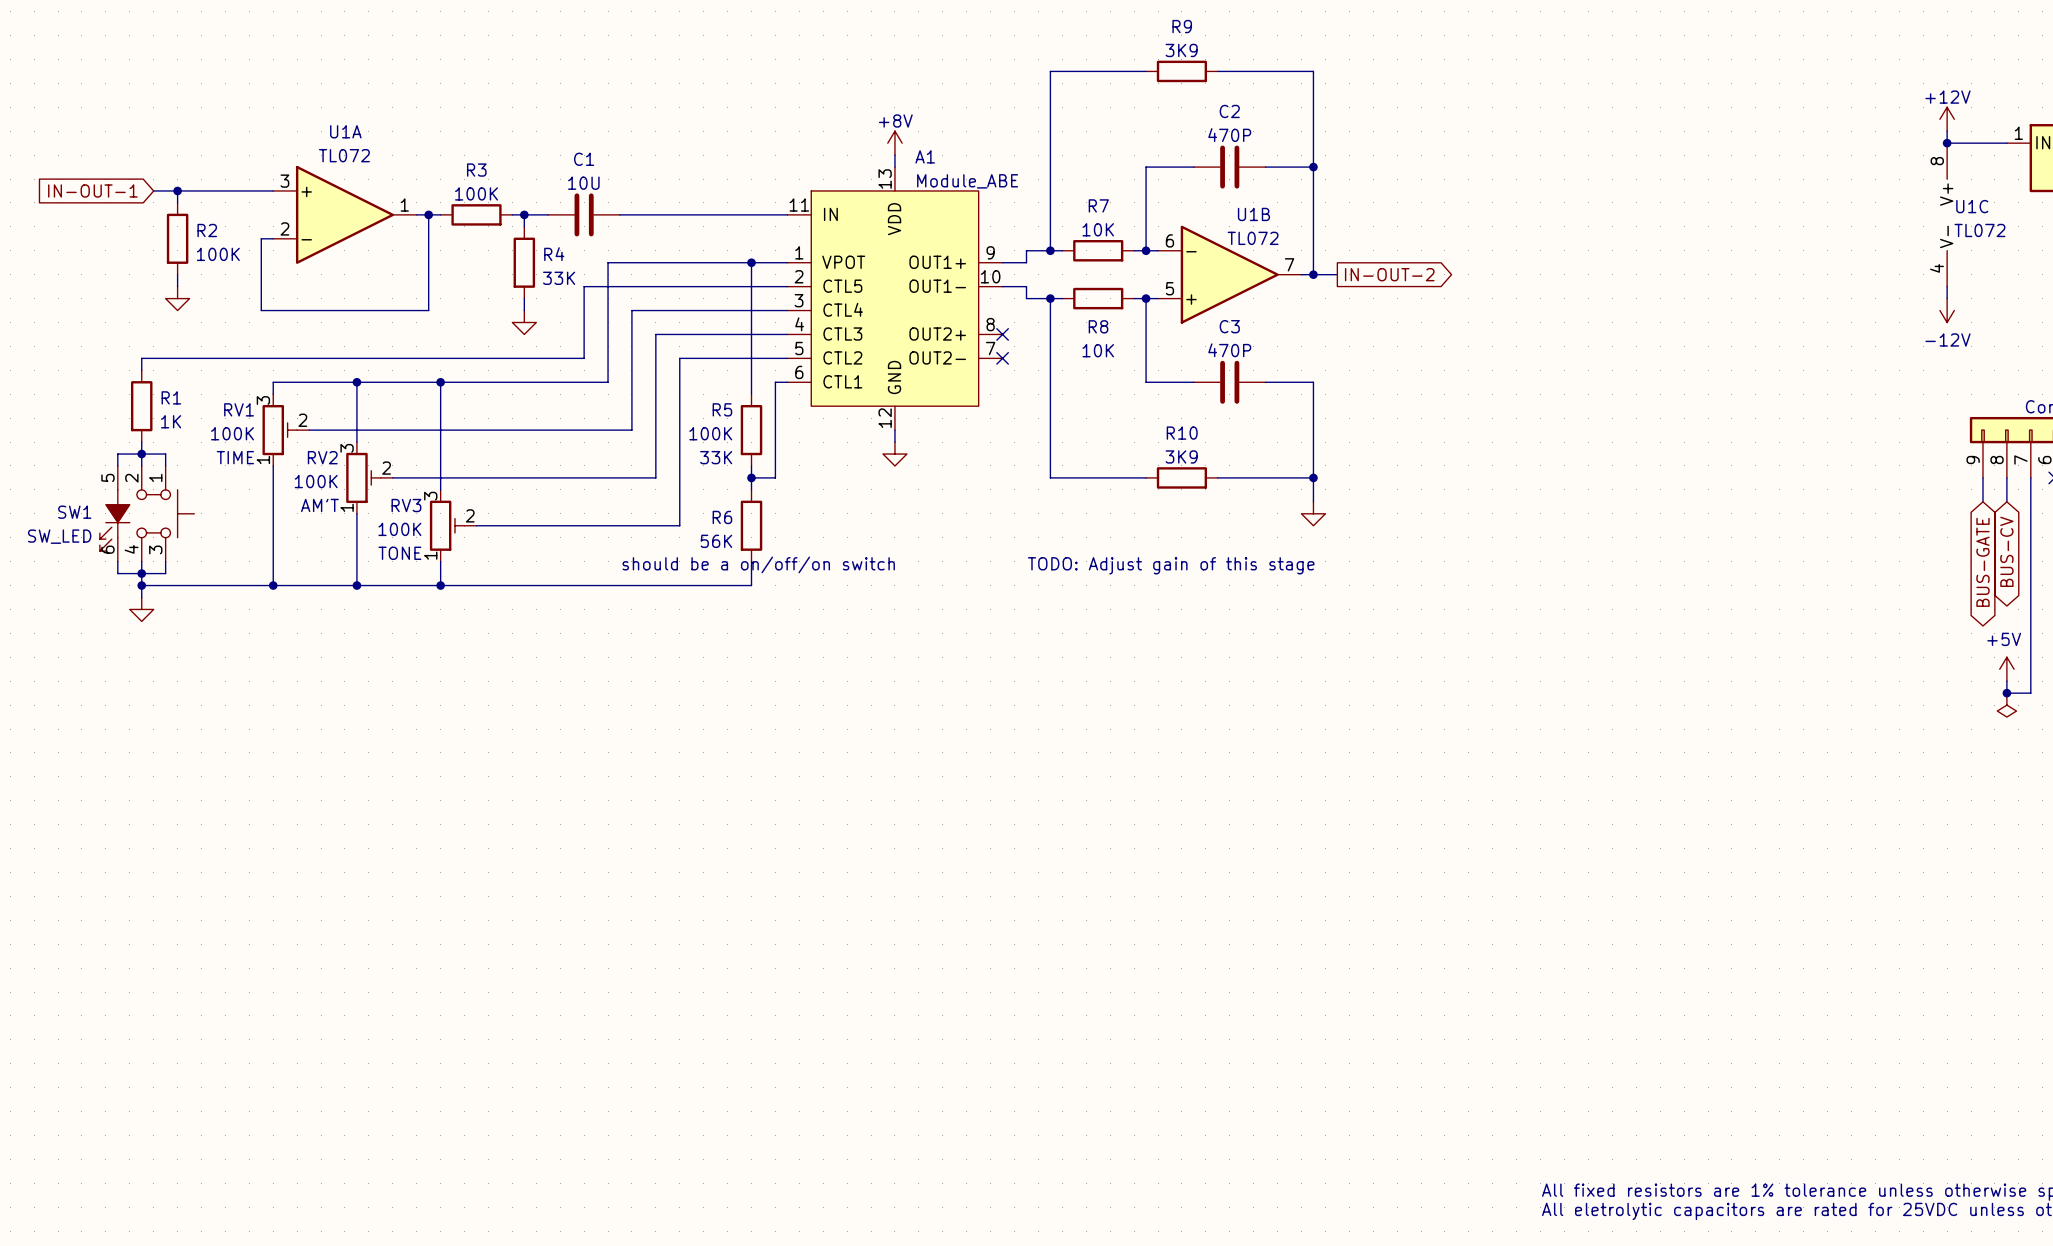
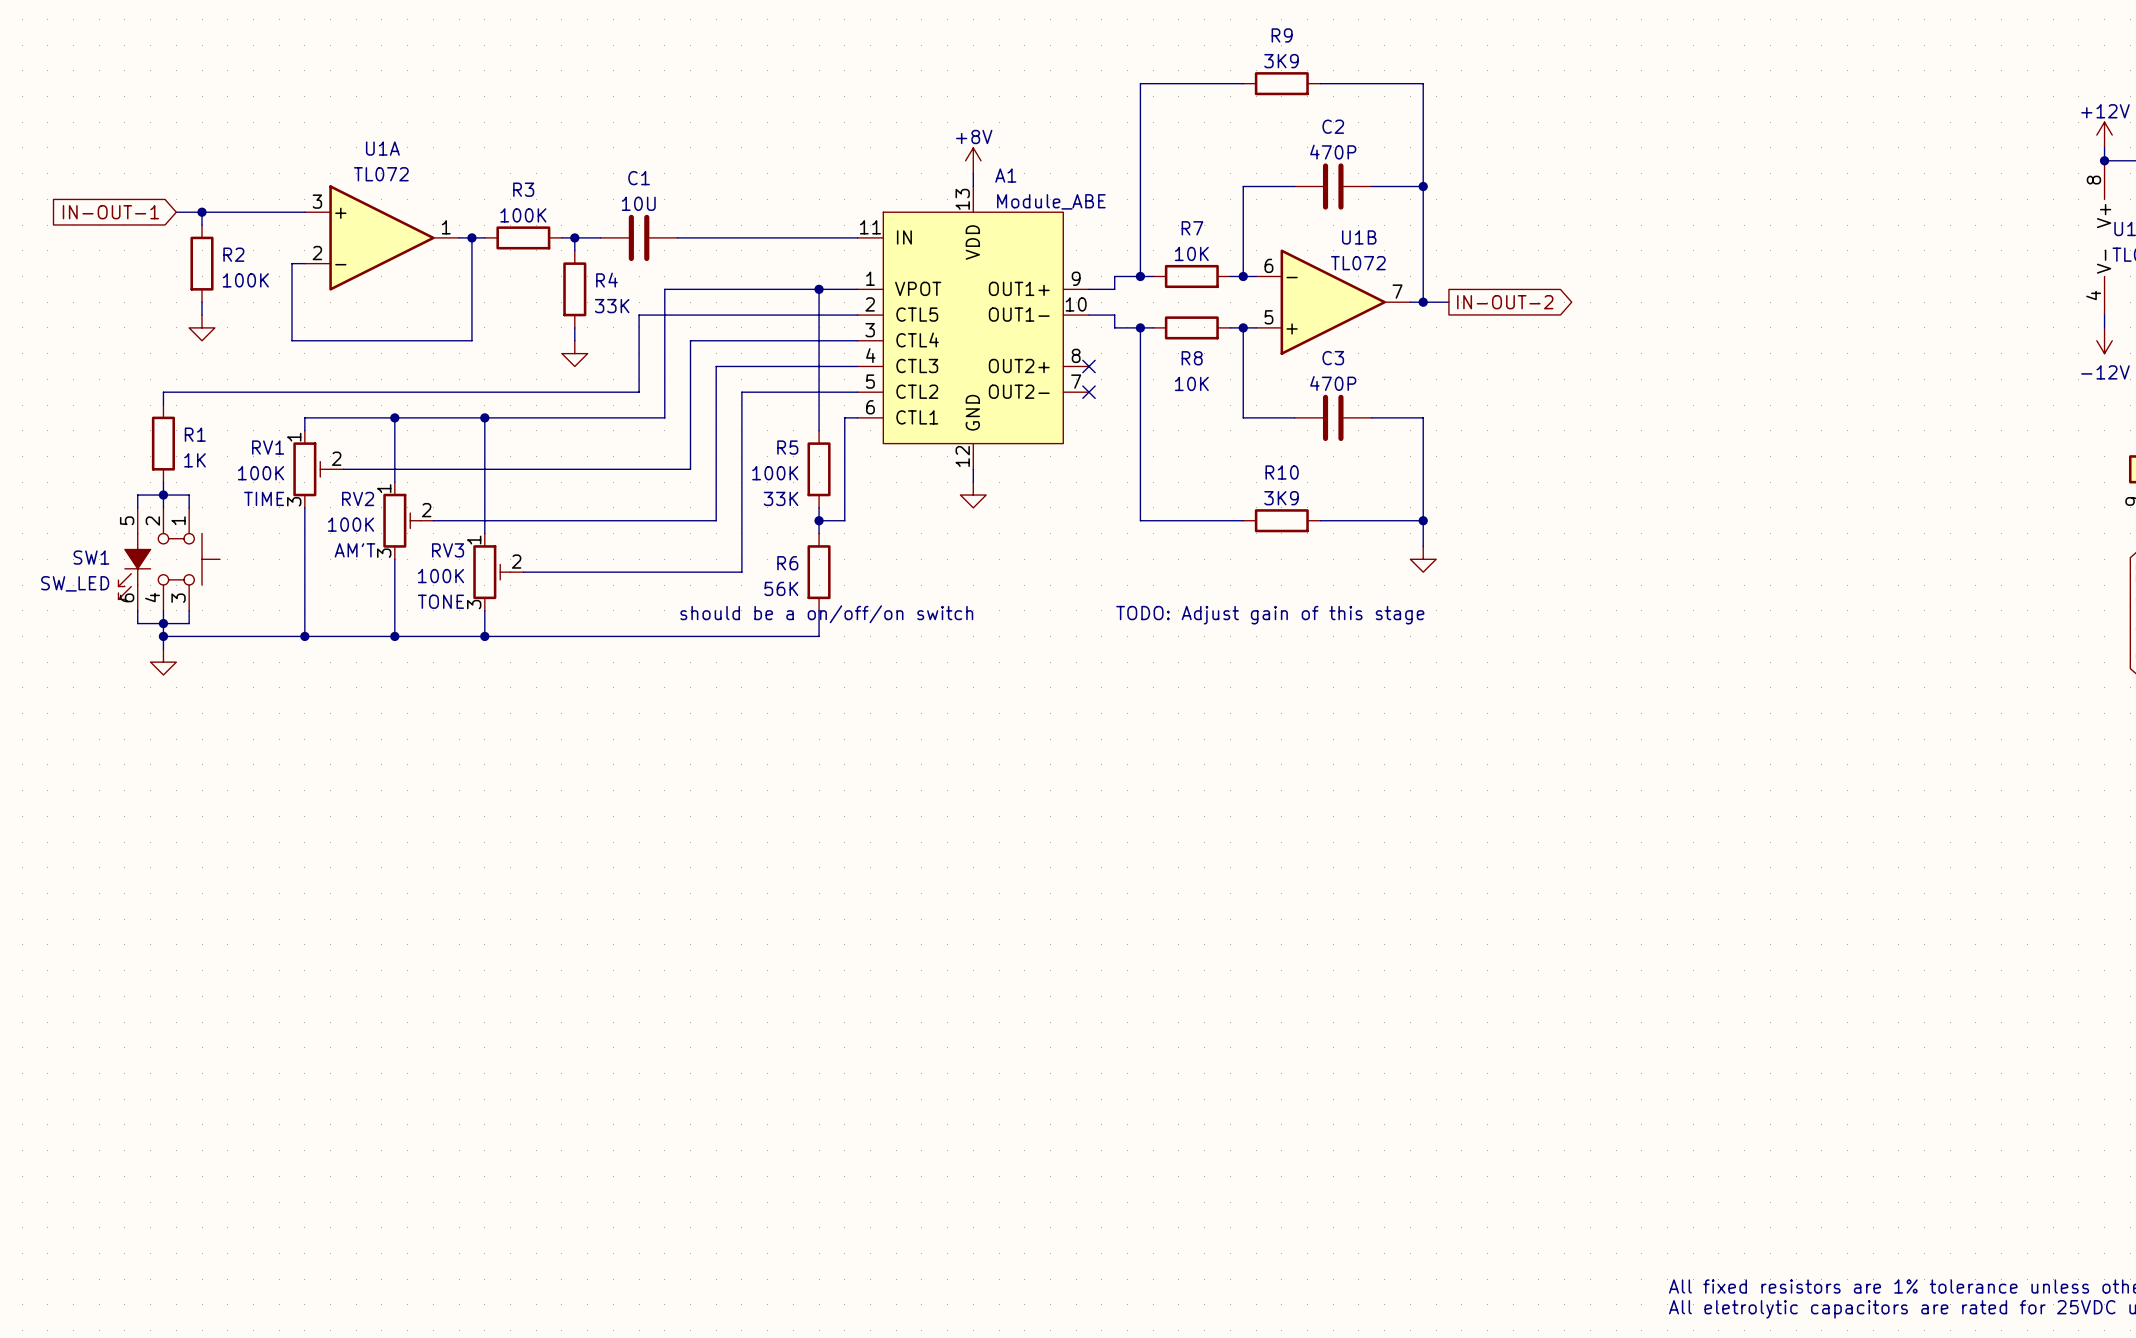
RV1 flip: as is (279, 430) -> up-down (311, 469)
RV2 flip: as is (363, 477) -> up-down (401, 520)
RV3 flip: as is (447, 525) -> up-down (491, 572)

